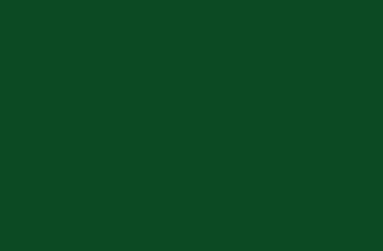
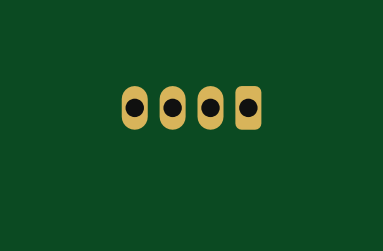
part: none -> (191, 107)

